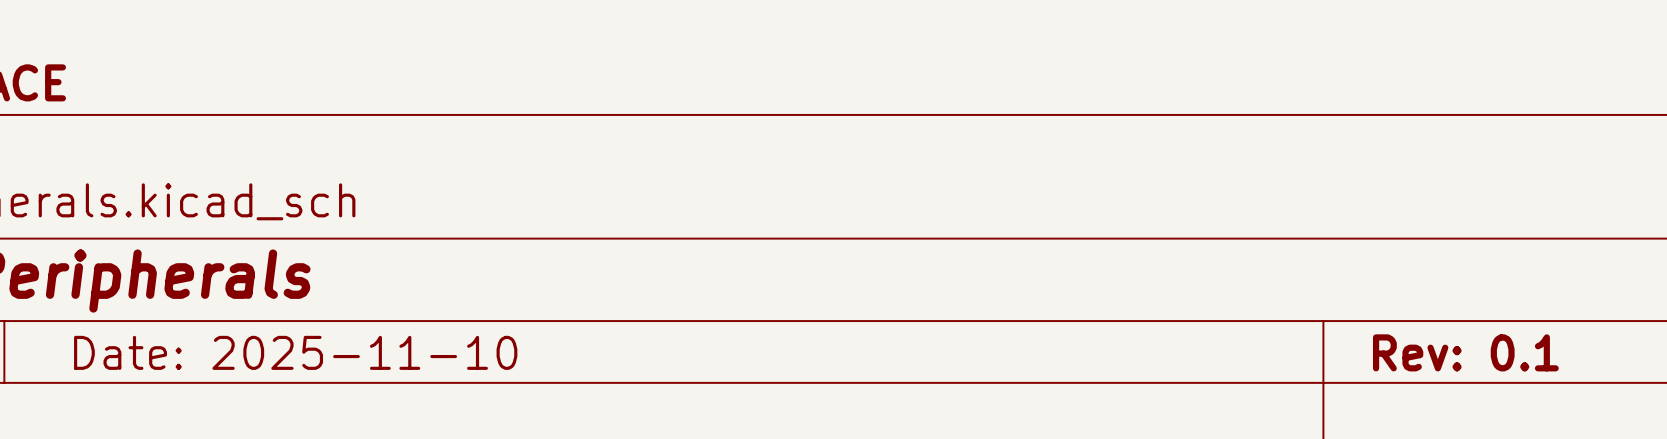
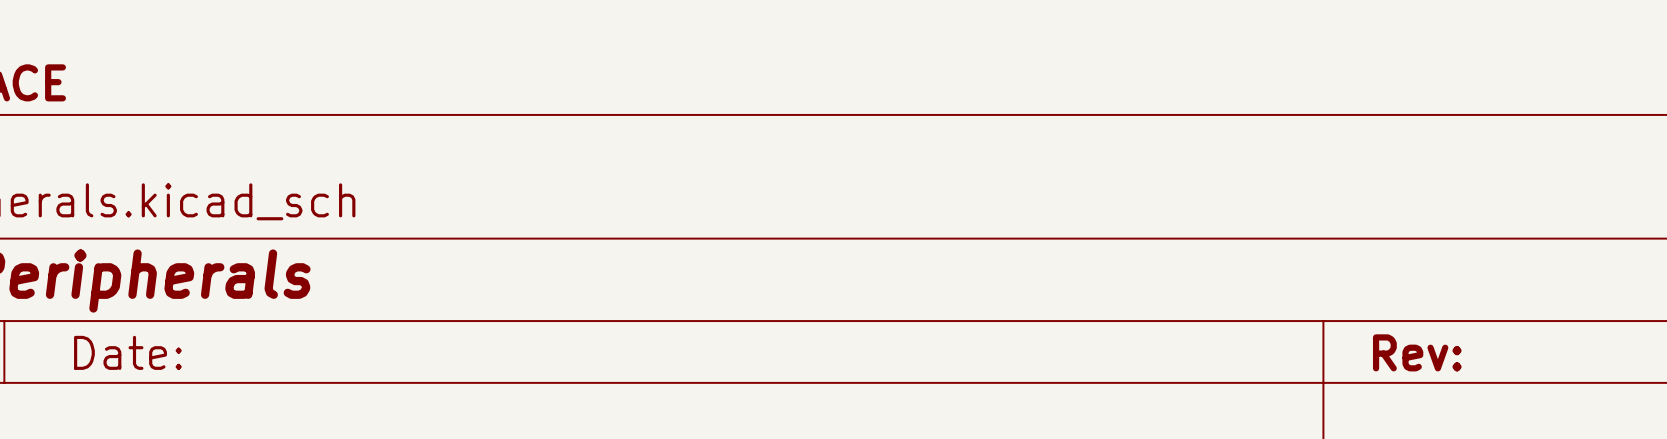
title block: Date: 2025-11-10 (295, 352) -> Date: (127, 352)
title block: Rev: 0.1 (1465, 352) -> Rev: (1417, 352)

